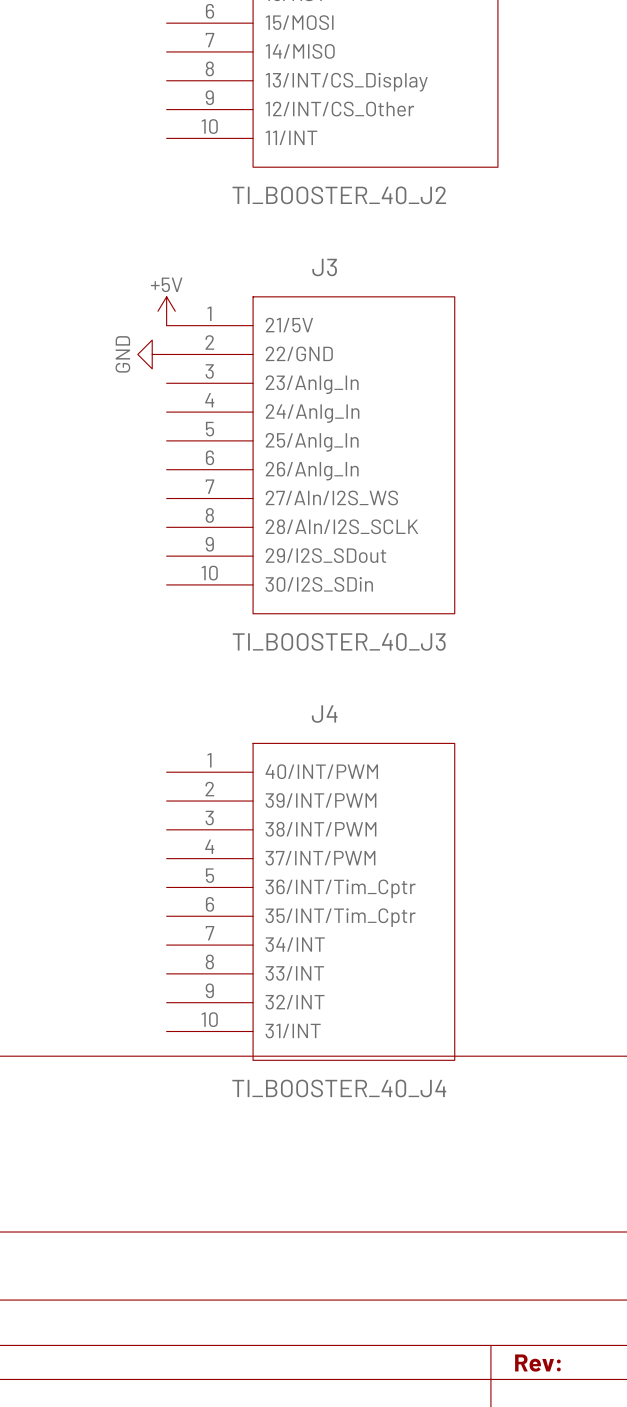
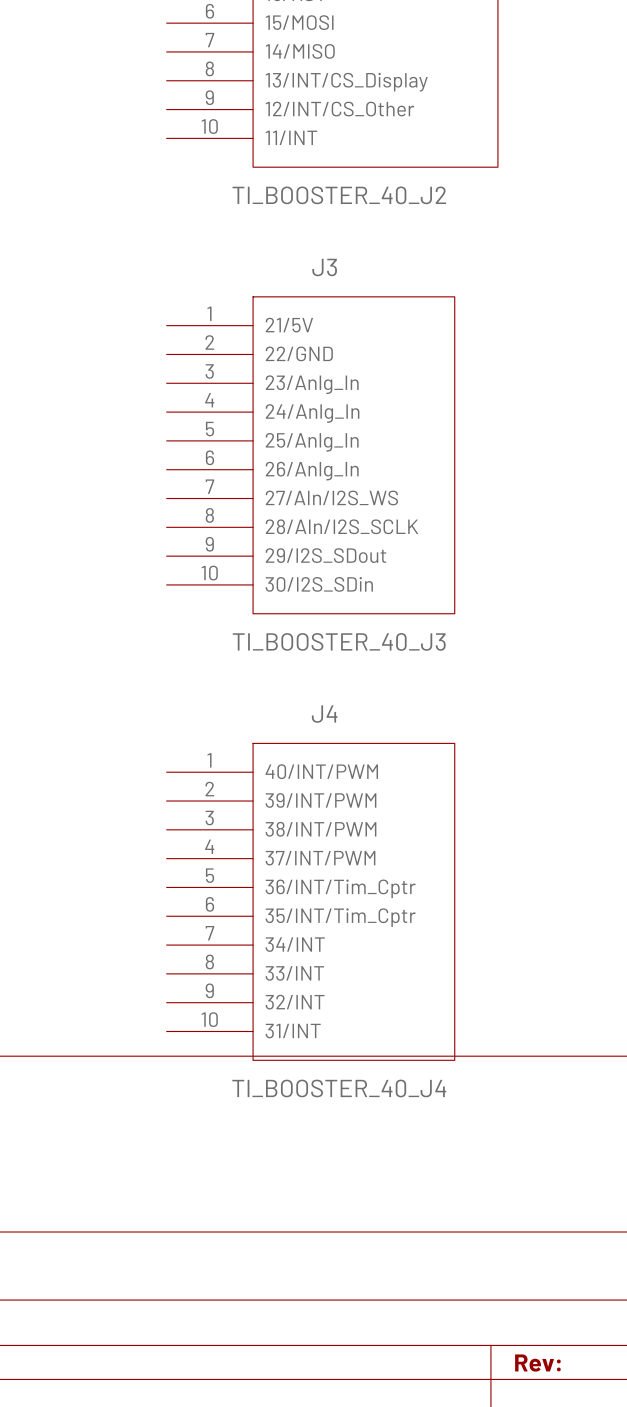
power symbol: +5V (166, 311) -> none
power symbol: GND (152, 354) -> none

